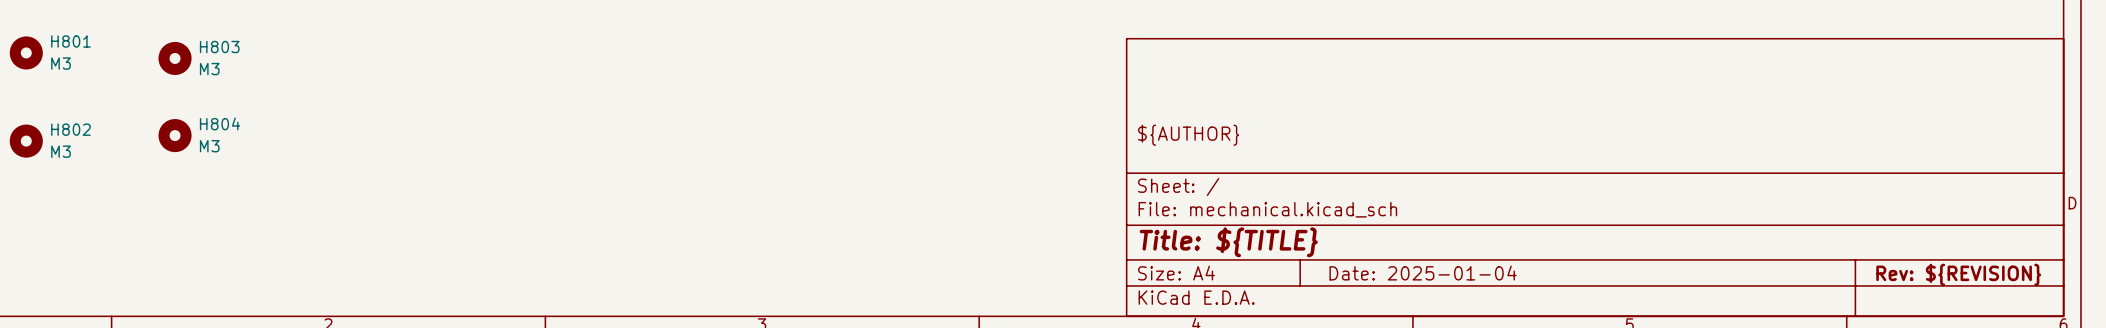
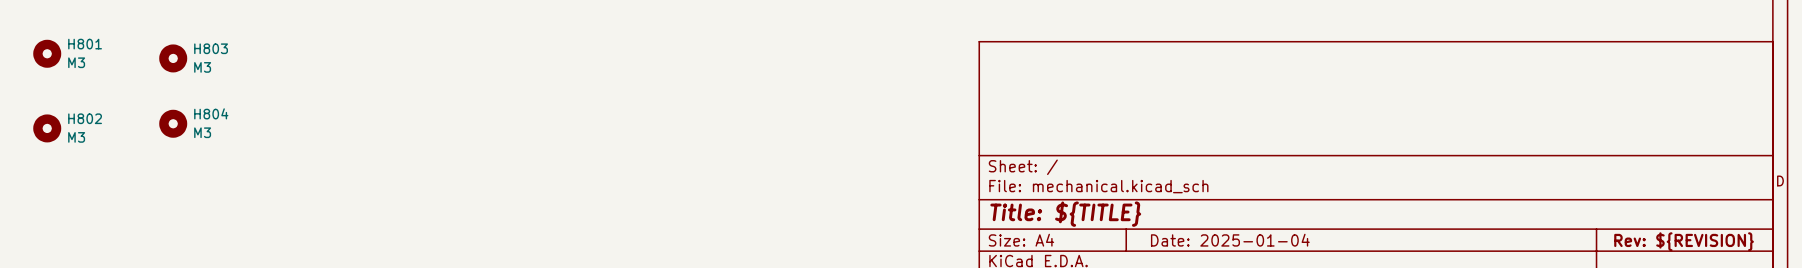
title block: ${AUTHOR} (1188, 135) -> none

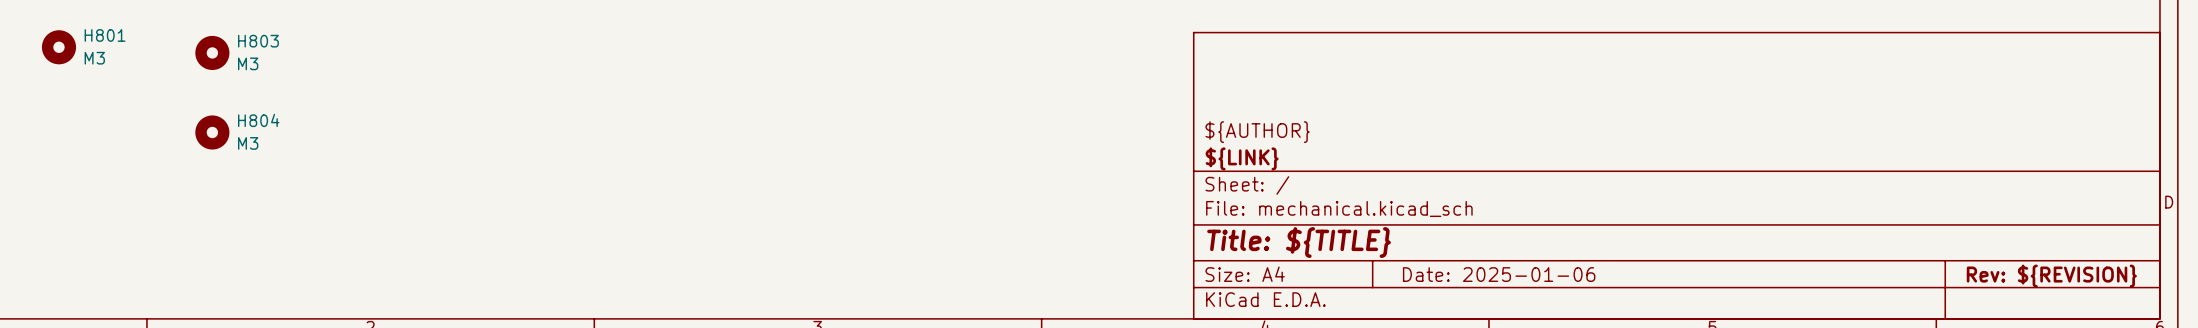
title block: none -> ${AUTHOR} (1257, 132)
H802: M3 (47, 128) -> none
title block: none -> ${LINK} (1242, 158)
title block: Date: 2025-01-04 (1230, 240) -> Date: 2025-01-06 (1499, 274)

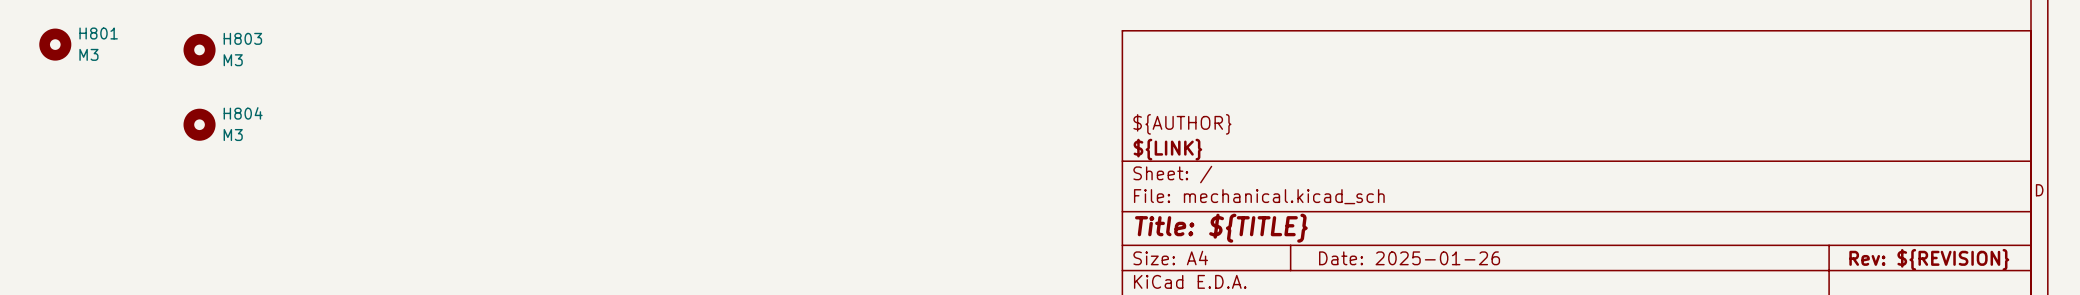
title block: Date: 2025-01-06 (1499, 274) -> Date: 2025-01-26 (1409, 258)

